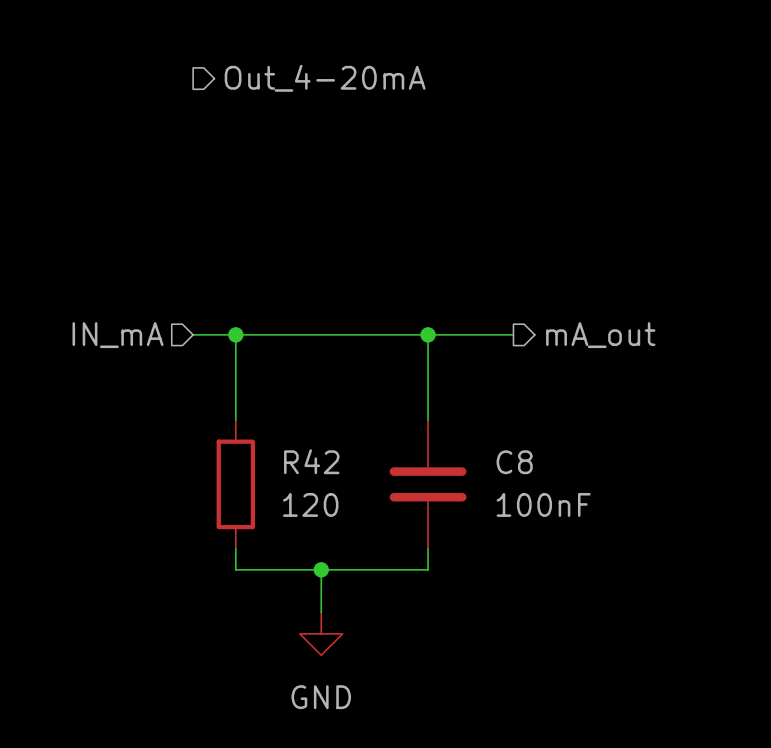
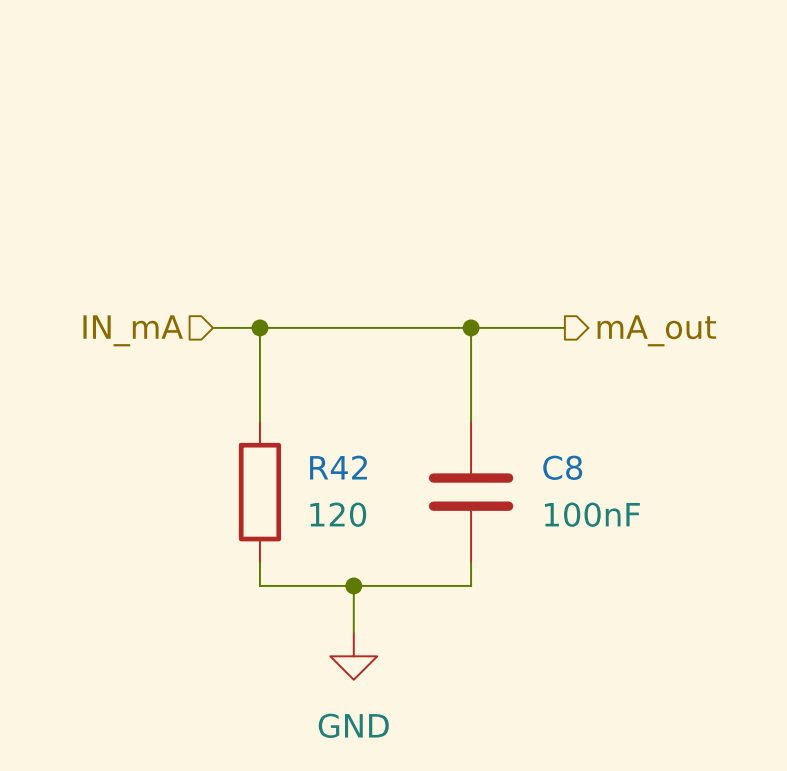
hierarchical label: Out_4-20mA (325, 78) -> none

